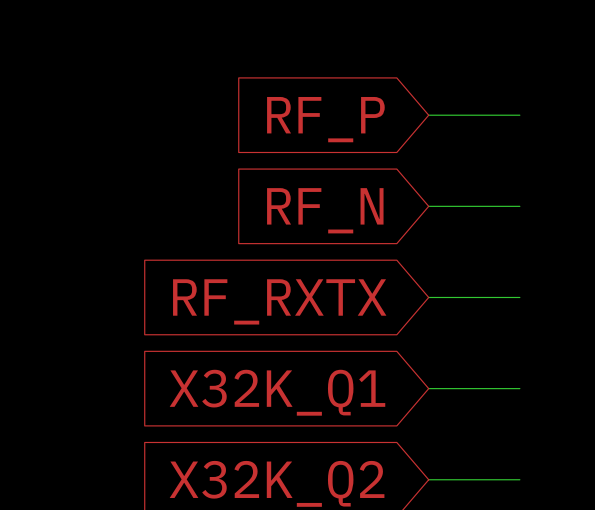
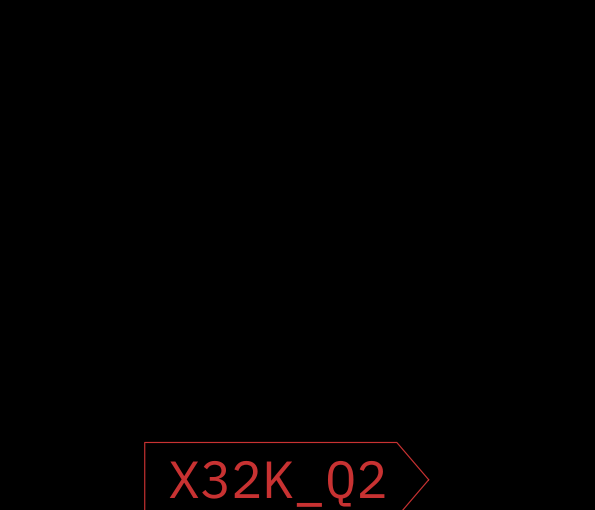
wire: (428, 115) (519, 115) -> none
global label: RF_P (325, 119) -> none
wire: (428, 206) (519, 206) -> none
global label: RF_N (325, 210) -> none
wire: (428, 297) (519, 297) -> none
global label: RF_RXTX (279, 301) -> none
wire: (428, 388) (519, 388) -> none
global label: X32K_Q1 (277, 392) -> none
wire: (428, 479) (519, 479) -> none

